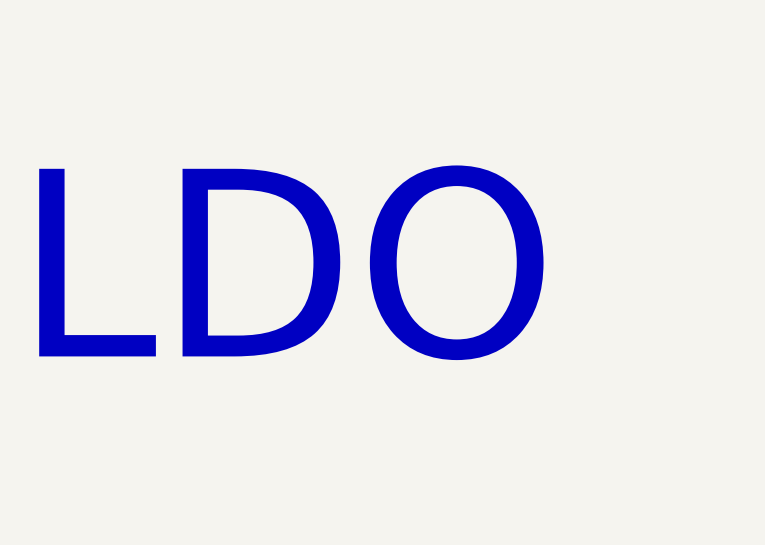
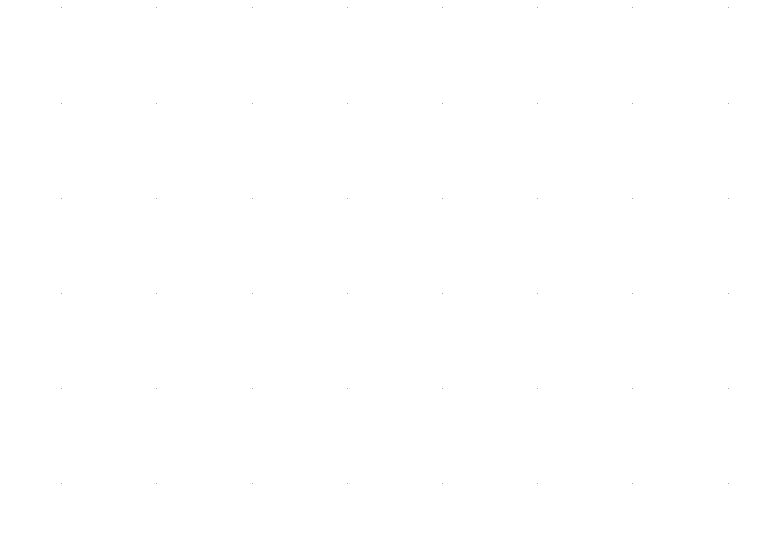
text: LDO (291, 262) -> none

